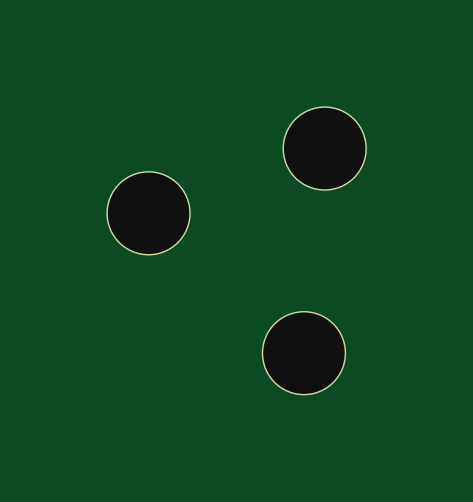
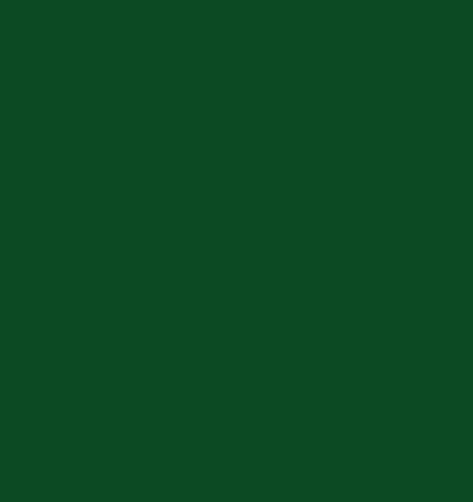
part: (324, 148) -> none
part: (148, 213) -> none
part: (303, 353) -> none

